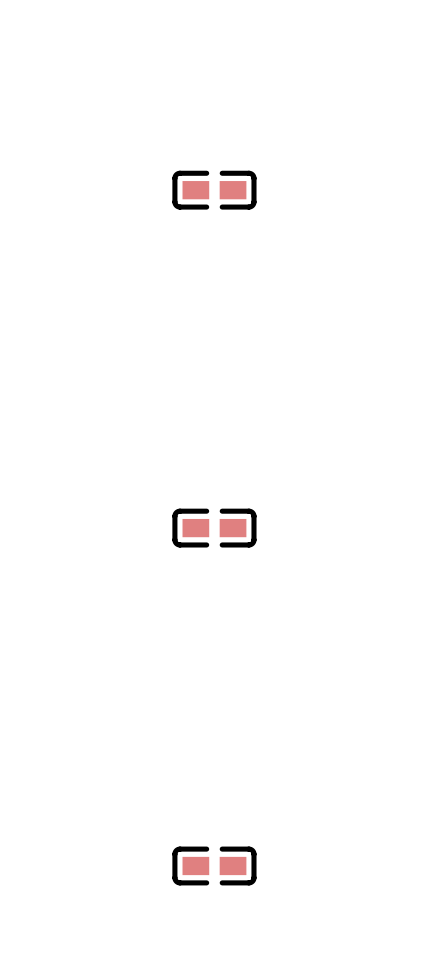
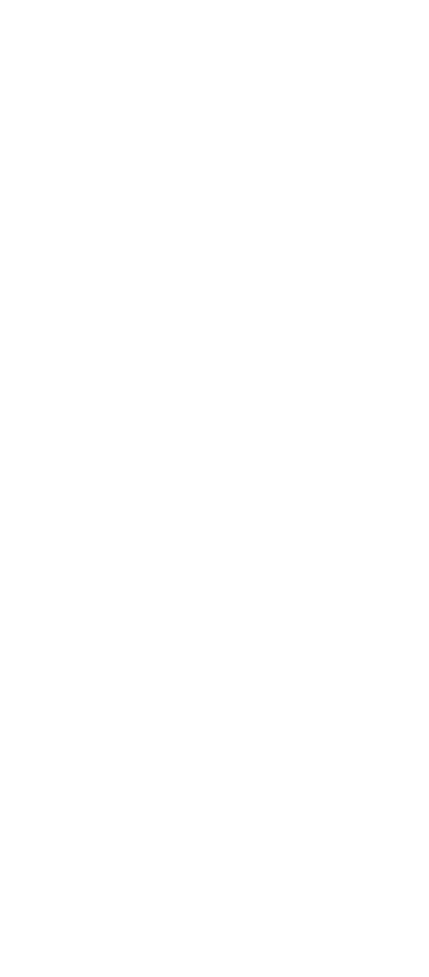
part: (214, 190) -> none
part: (214, 528) -> none
part: (214, 865) -> none

